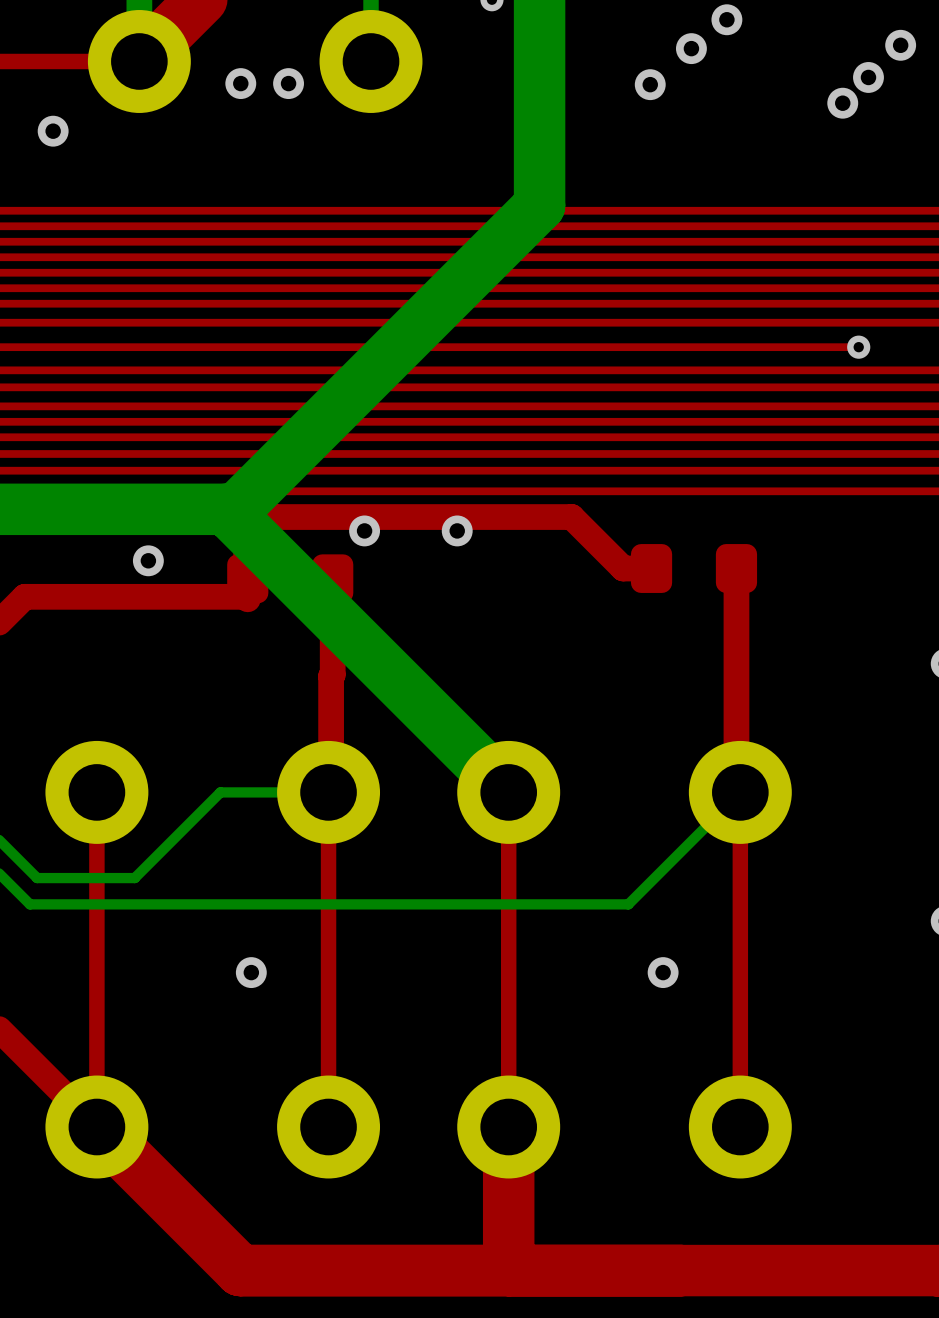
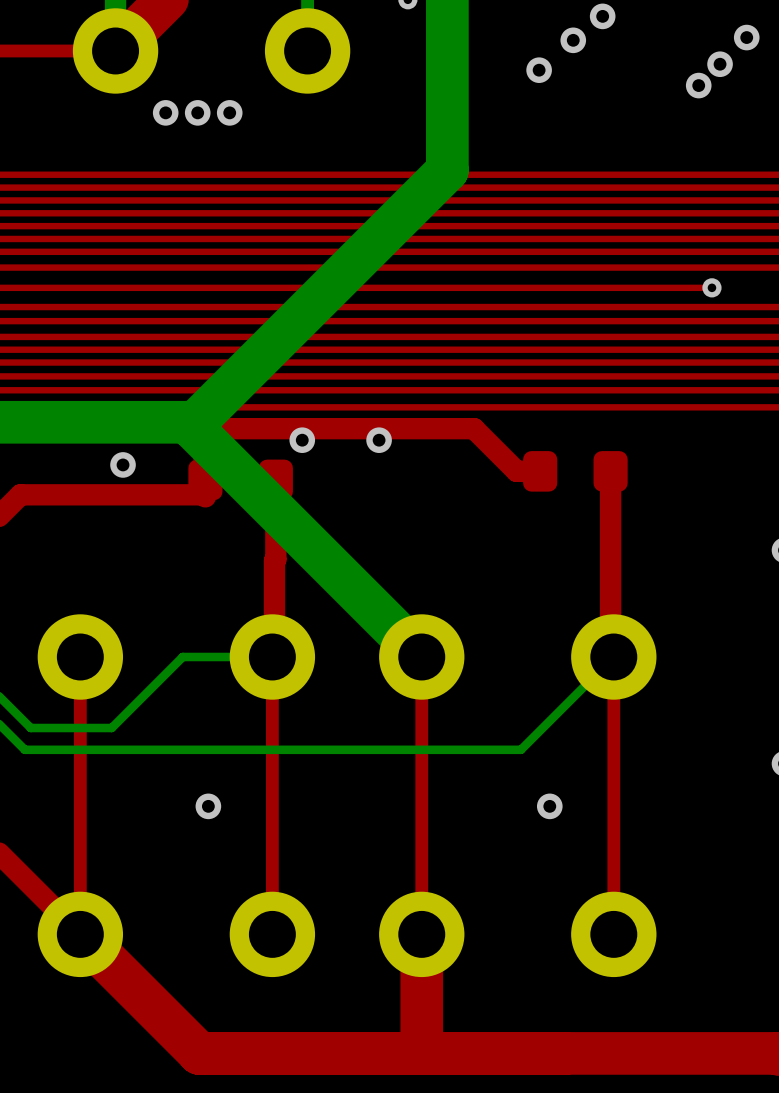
via: (240, 83) -> none
via: (288, 83) -> none
via: (53, 131) -> none
via: none -> (165, 112)
via: none -> (197, 112)
via: none -> (229, 112)

